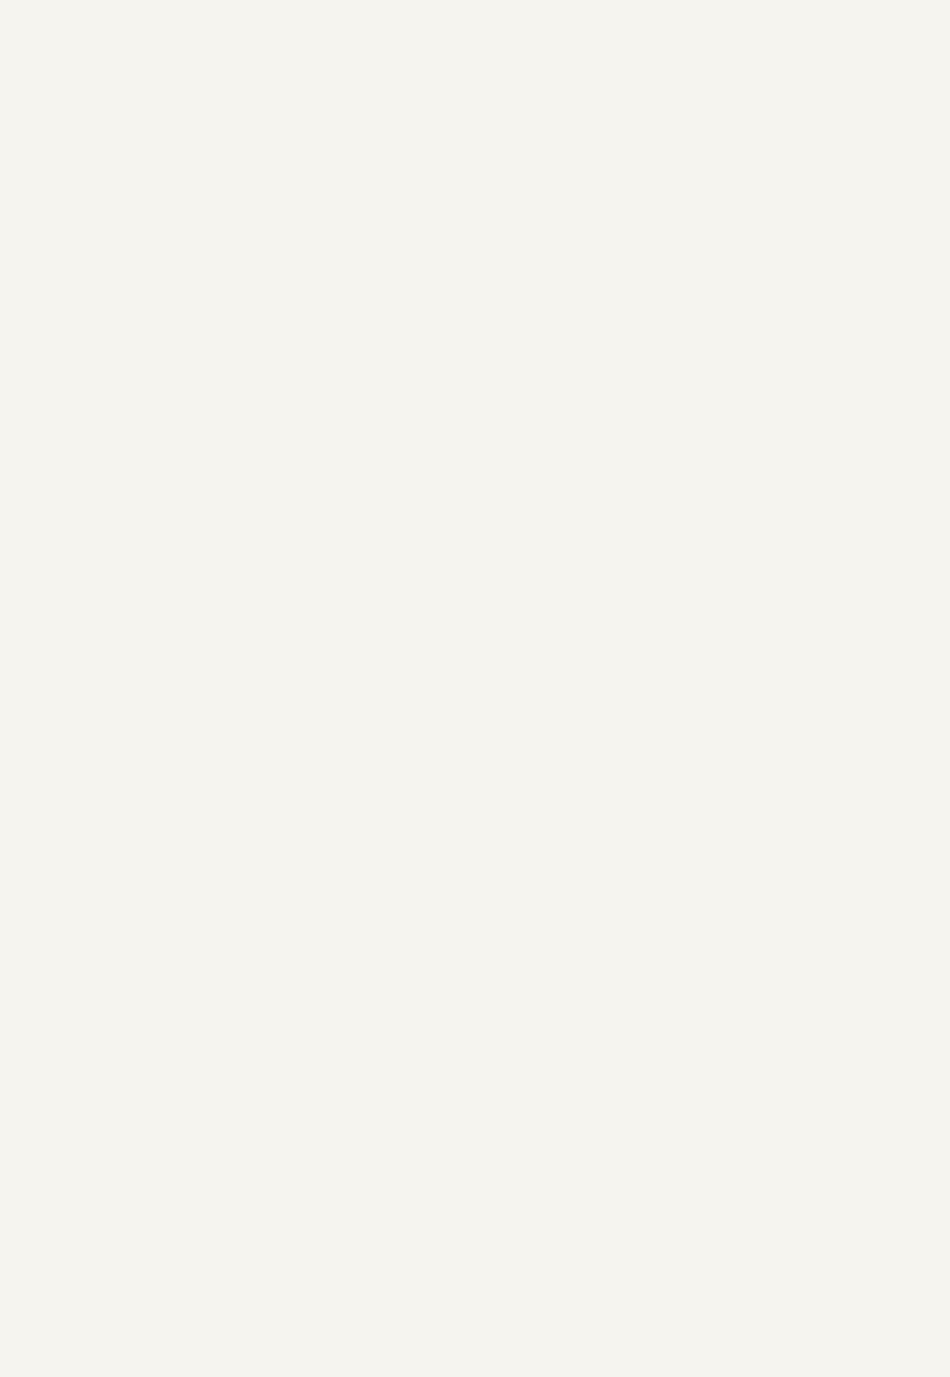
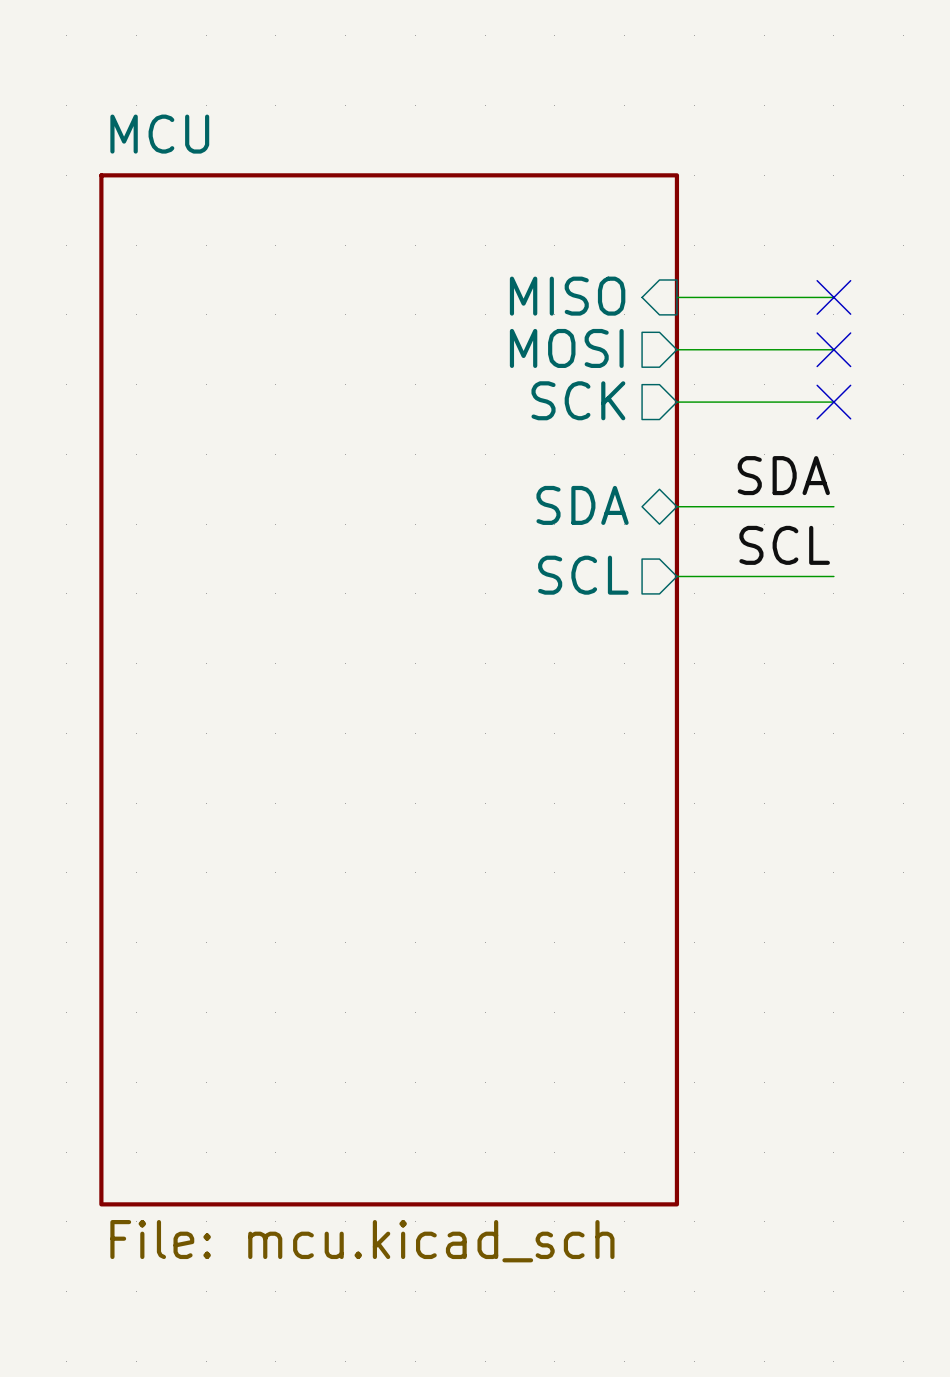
sheet pin: none -> MISO (567, 296)
wire: none -> (676, 297) (833, 297)
no-connect mark: none -> (833, 297)
sheet pin: none -> MOSI (566, 348)
wire: none -> (676, 349) (833, 349)
no-connect mark: none -> (833, 349)
sheet pin: none -> SCK (578, 400)
wire: none -> (676, 402) (833, 402)
no-connect mark: none -> (833, 402)
label: none -> SDA (783, 475)
sheet pin: none -> SDA (582, 505)
wire: none -> (676, 506) (833, 506)
label: none -> SCL (784, 545)
sheet pin: none -> SCL (583, 575)
wire: none -> (676, 576) (833, 576)
sheet MCU: none -> File: mcu.kicad_sch (389, 689)

